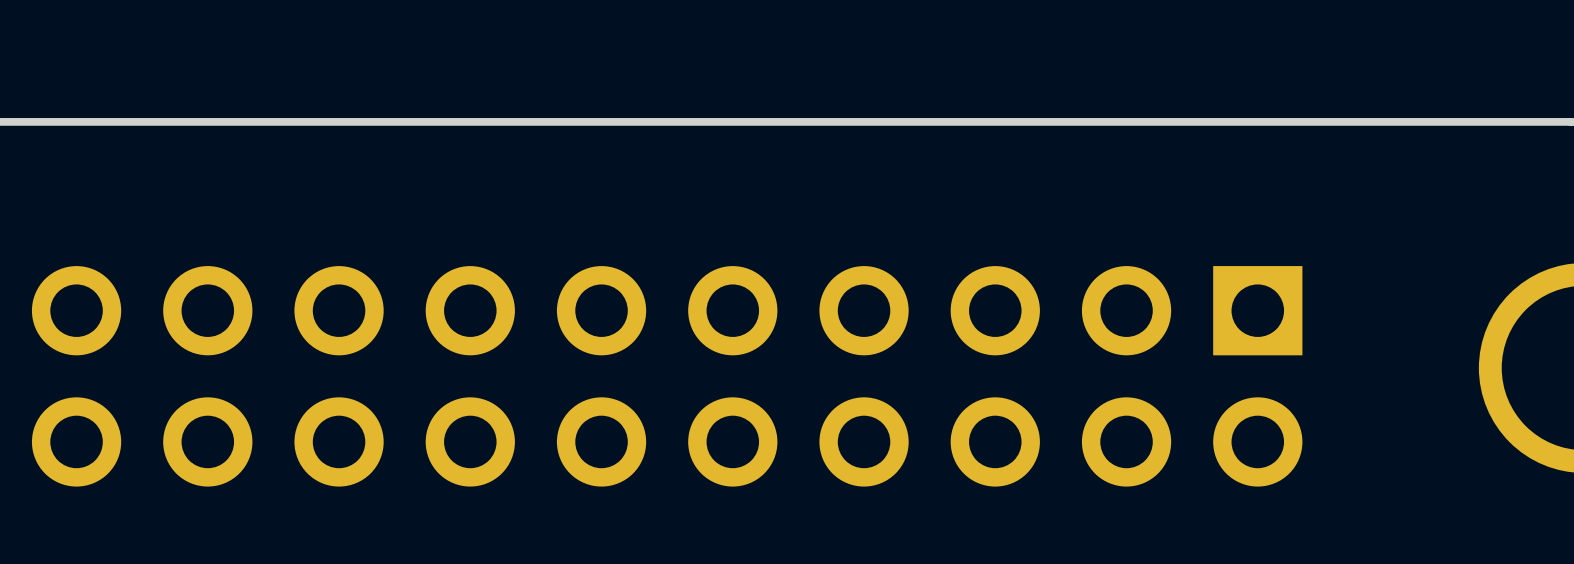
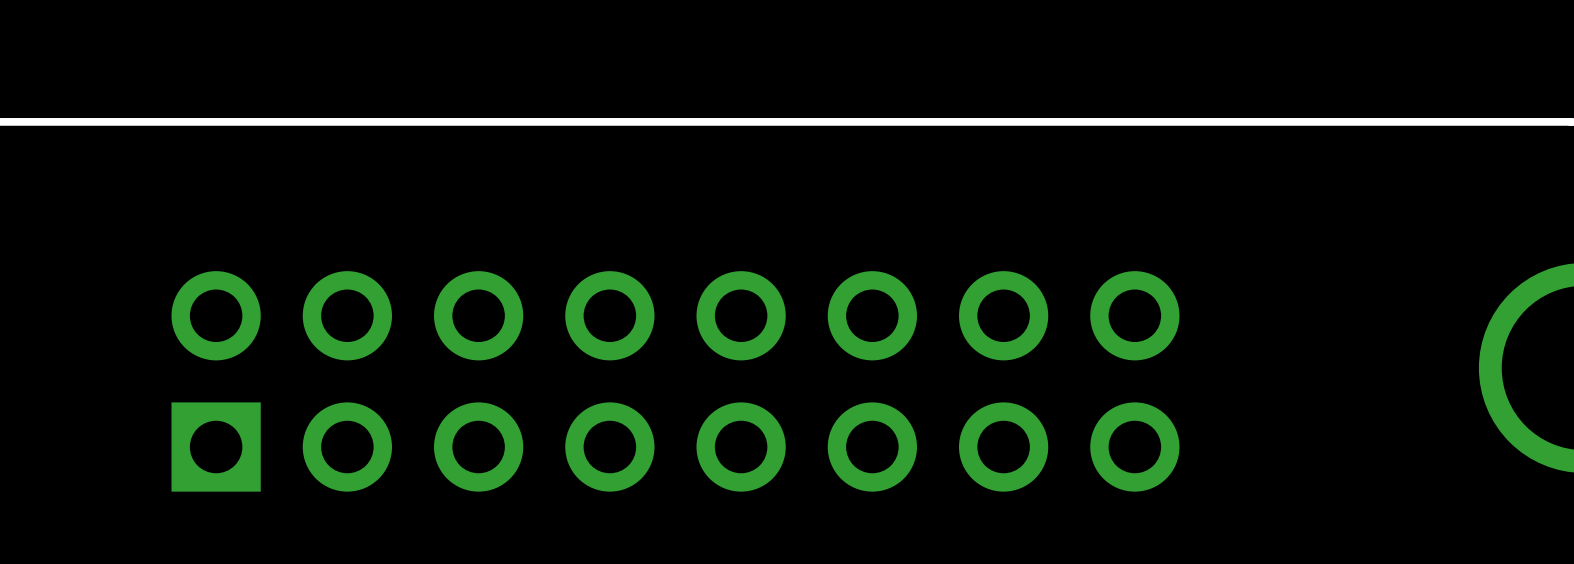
part footprint: [31, 266, 1303, 487] -> [171, 271, 1180, 492]

